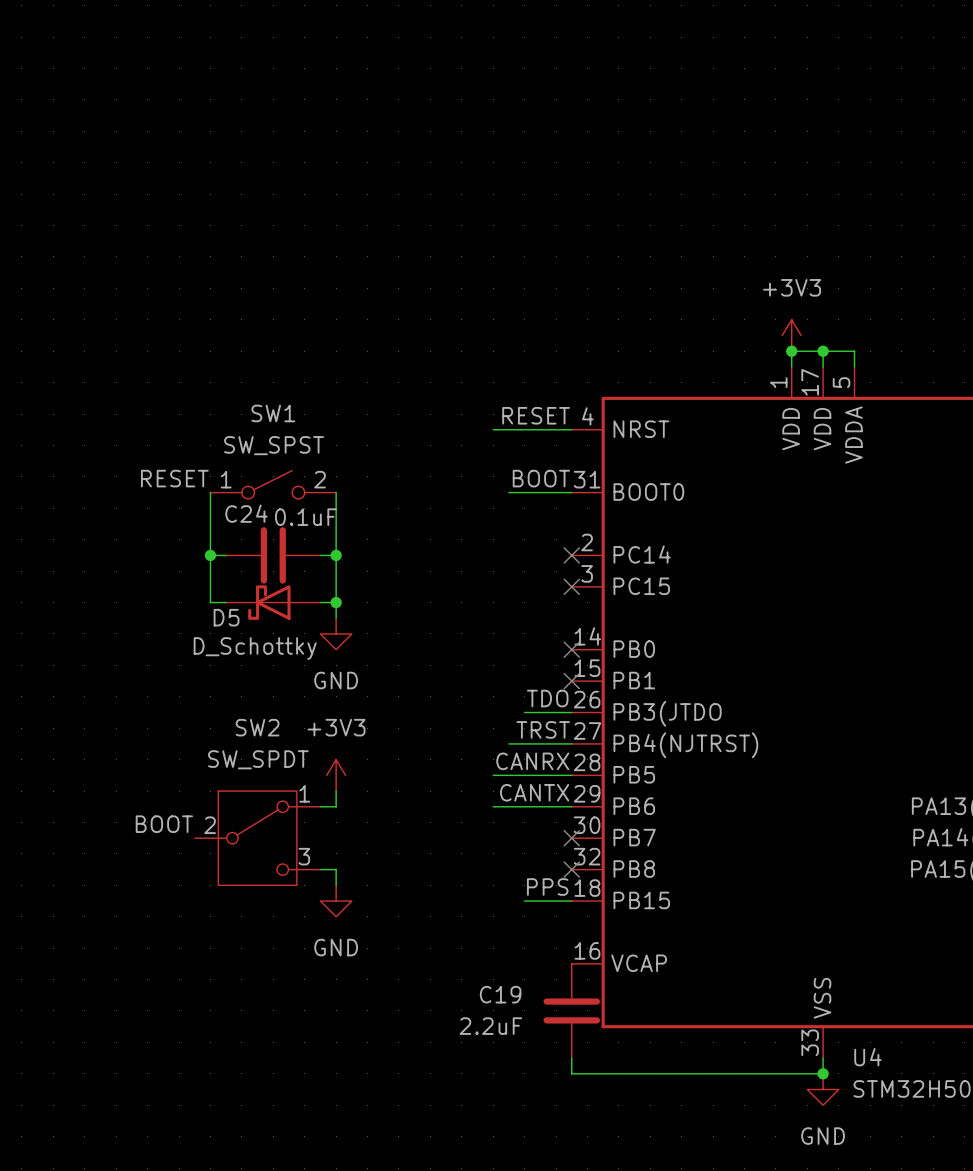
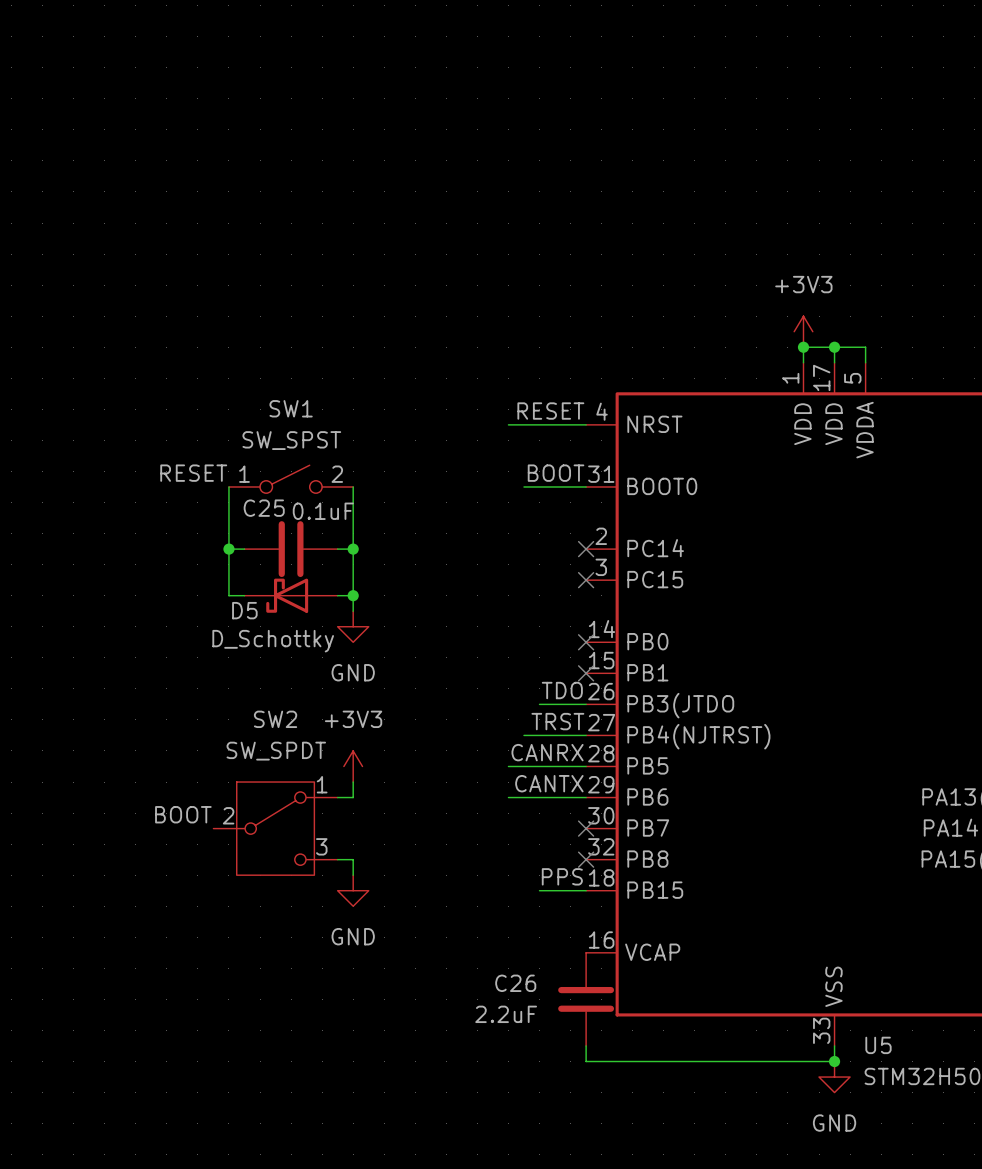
C24 name: C24 (246, 513) -> C25 (264, 508)
C19 name: C19 (500, 994) -> C26 (515, 983)
U4 name: U4 (867, 1057) -> U5 (878, 1045)

